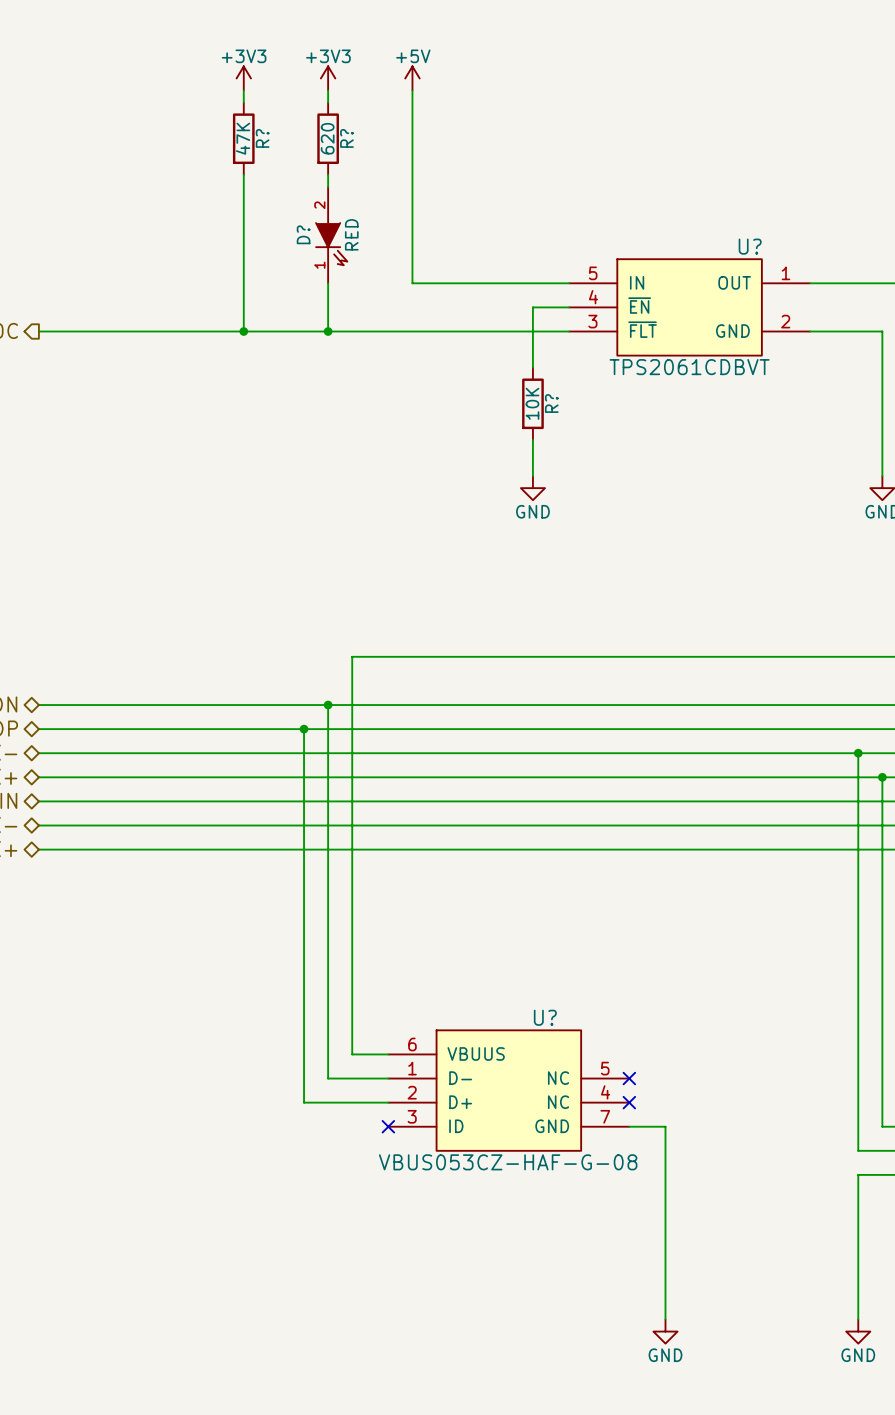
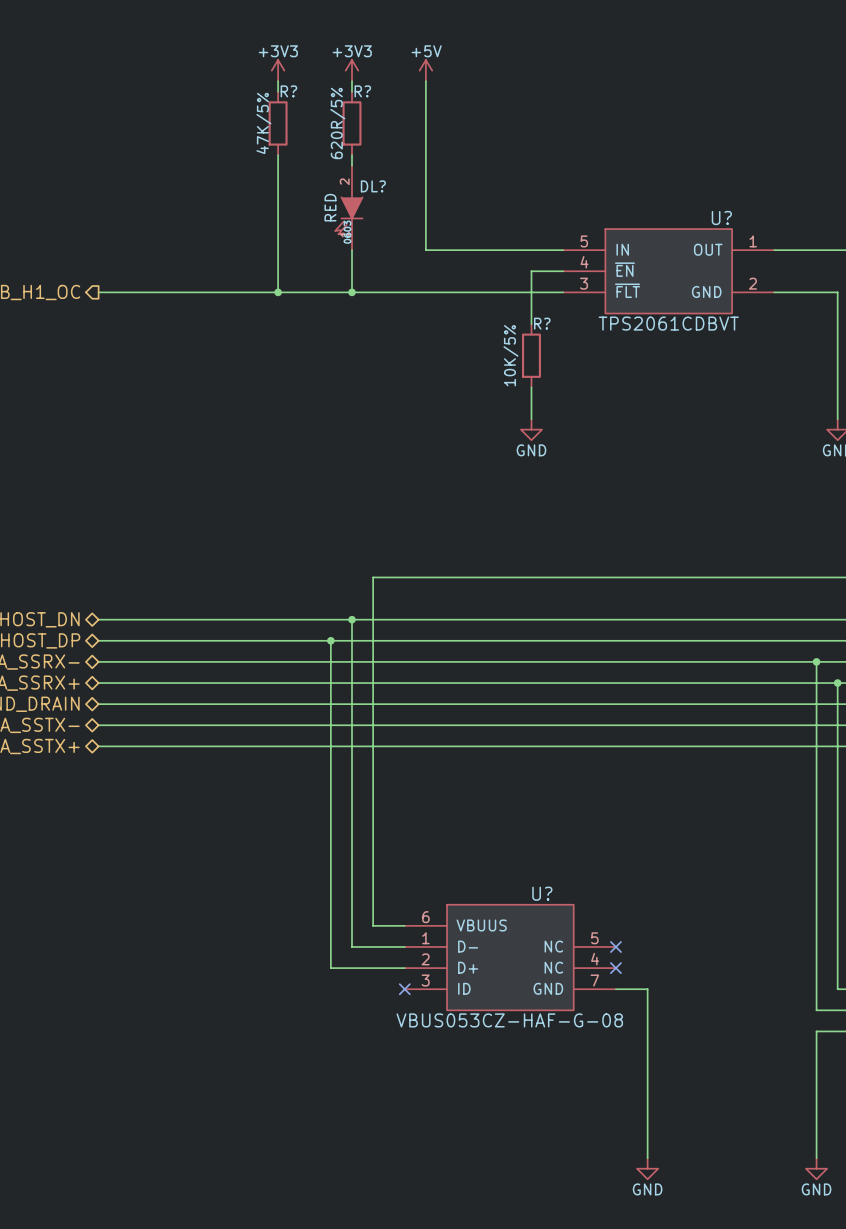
R? value: 47K (243, 138) -> 47K/5% (263, 123)
R? name rotation: 0° (262, 138) -> 90° clockwise (288, 91)
R? name position: R? (262, 138) -> R? (288, 91)
R? value: 620 (327, 138) -> 620R/5% (337, 123)
R? name rotation: 0° (346, 138) -> 90° clockwise (362, 91)
R? name position: R? (346, 138) -> R? (362, 91)
DL?: none -> RED (348, 207)
D?: RED (331, 235) -> none
R? value: 10K (532, 403) -> 10K/5% (510, 355)
R? name rotation: 0° (551, 403) -> 90° clockwise (542, 323)
R? name position: R? (551, 403) -> R? (542, 323)

